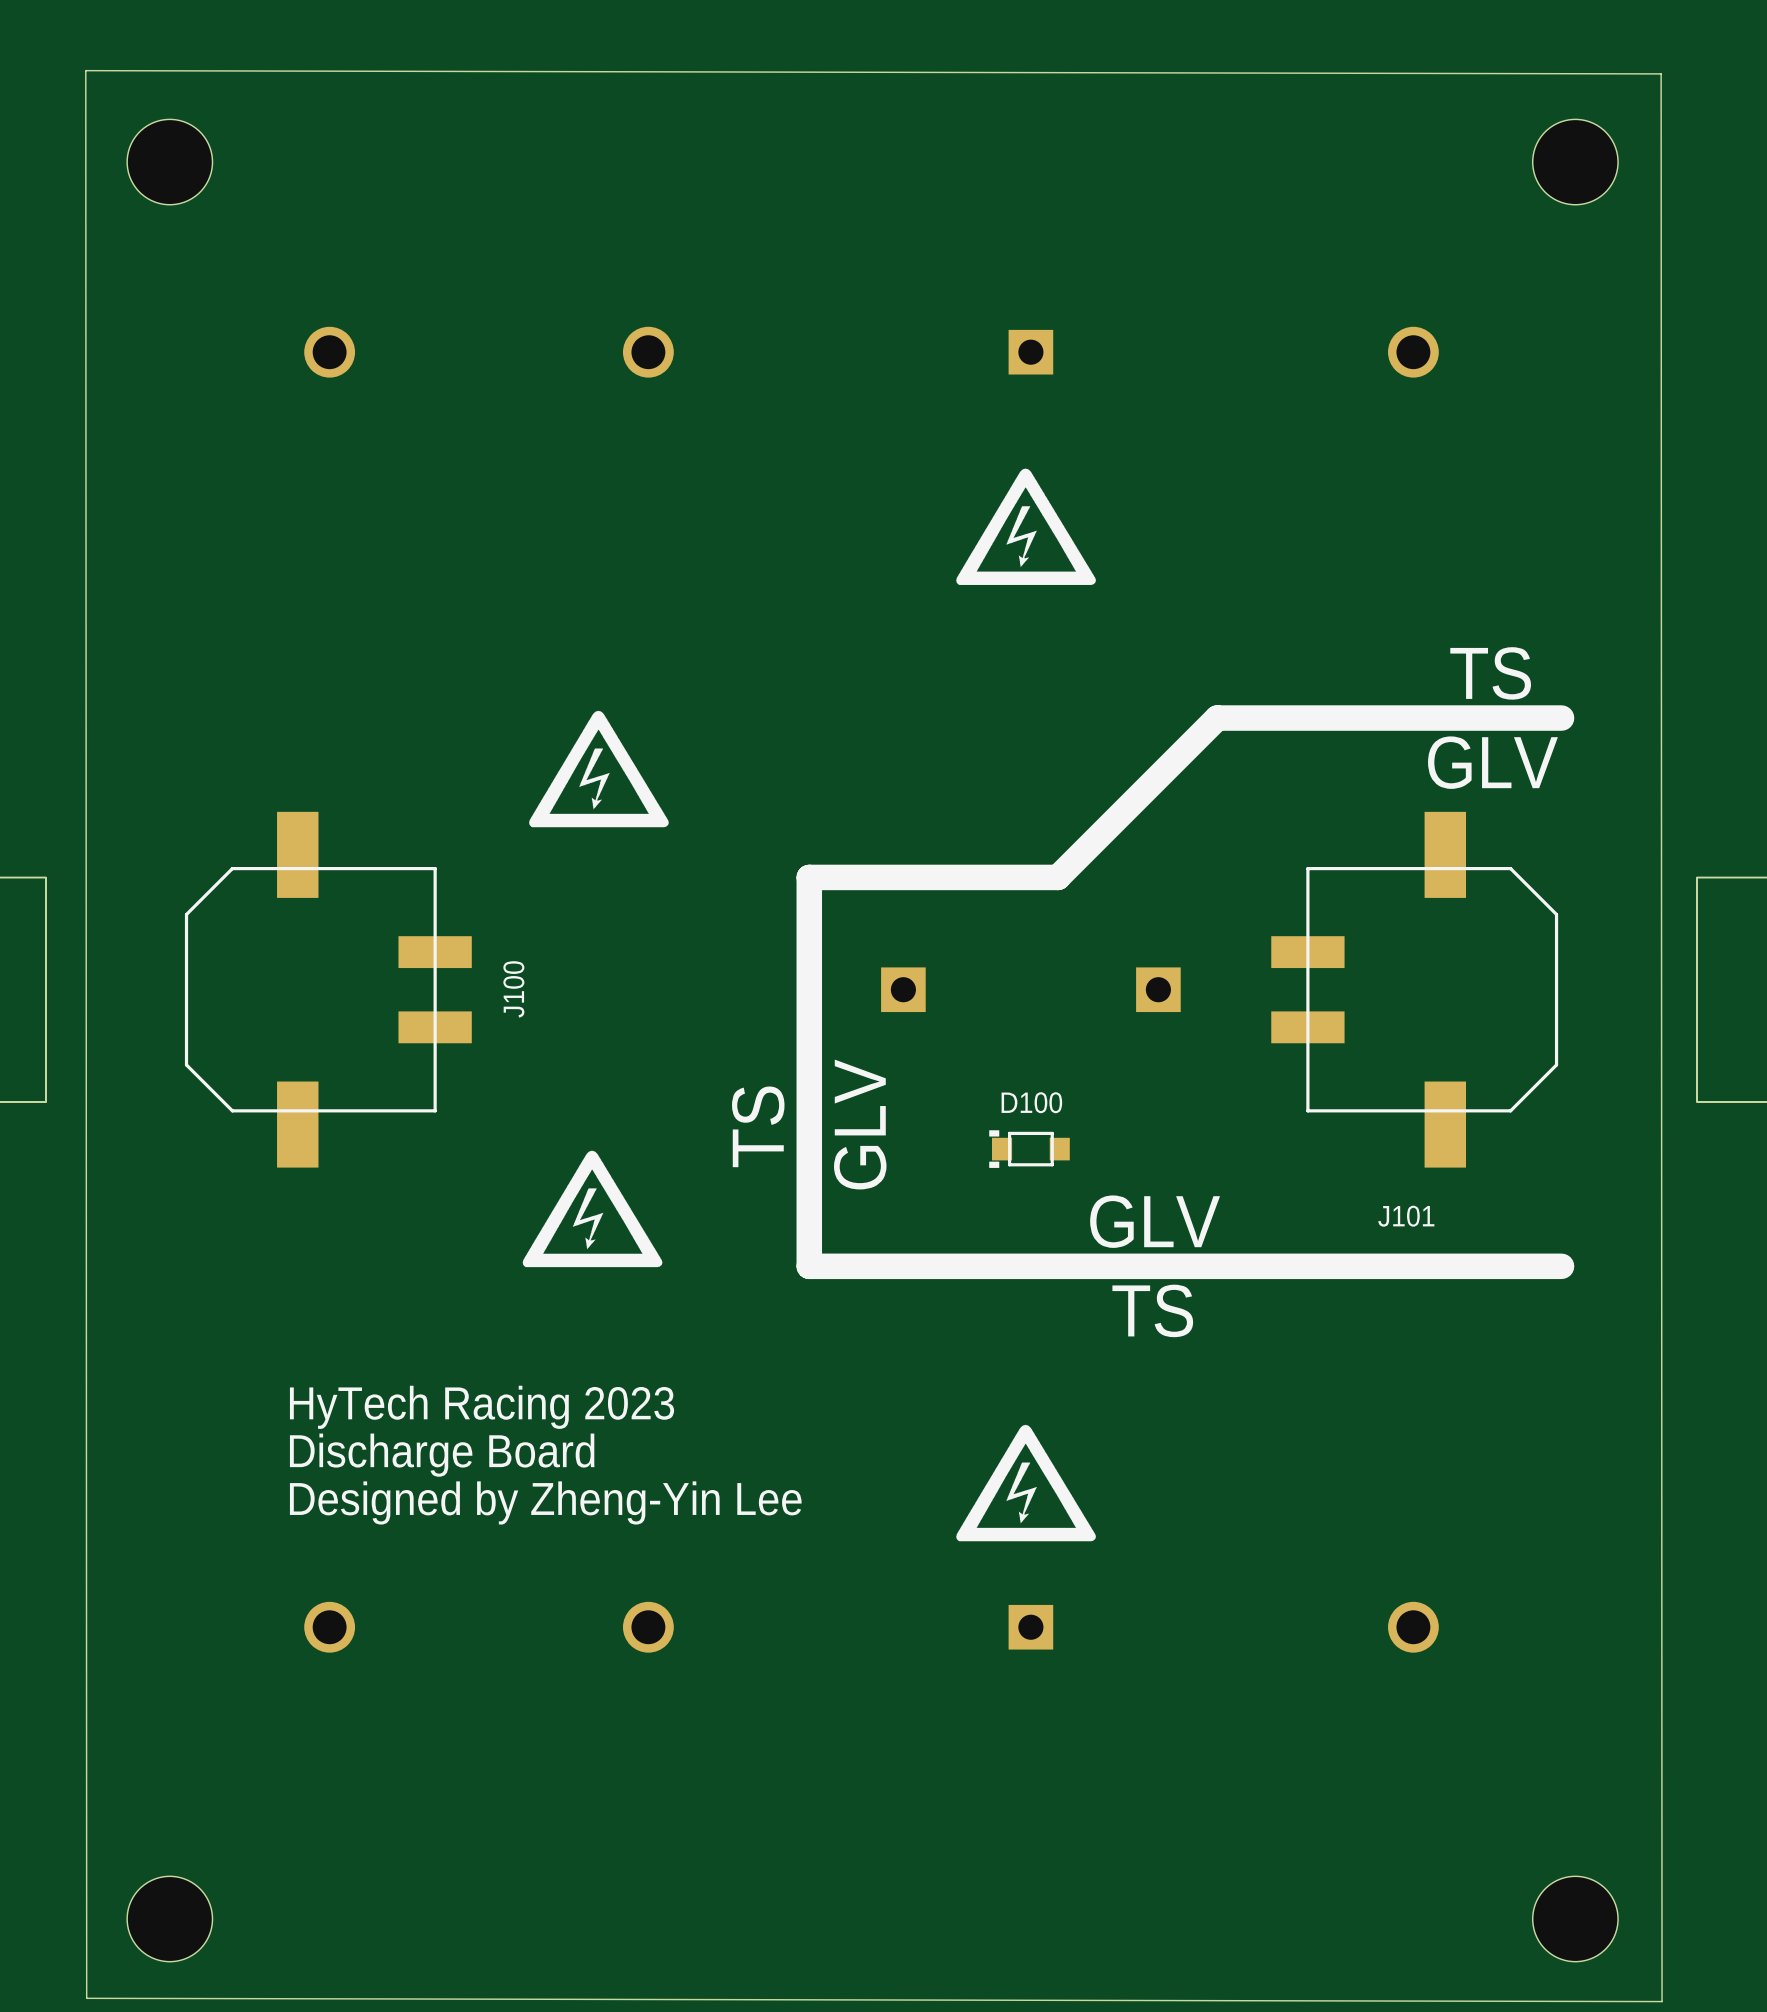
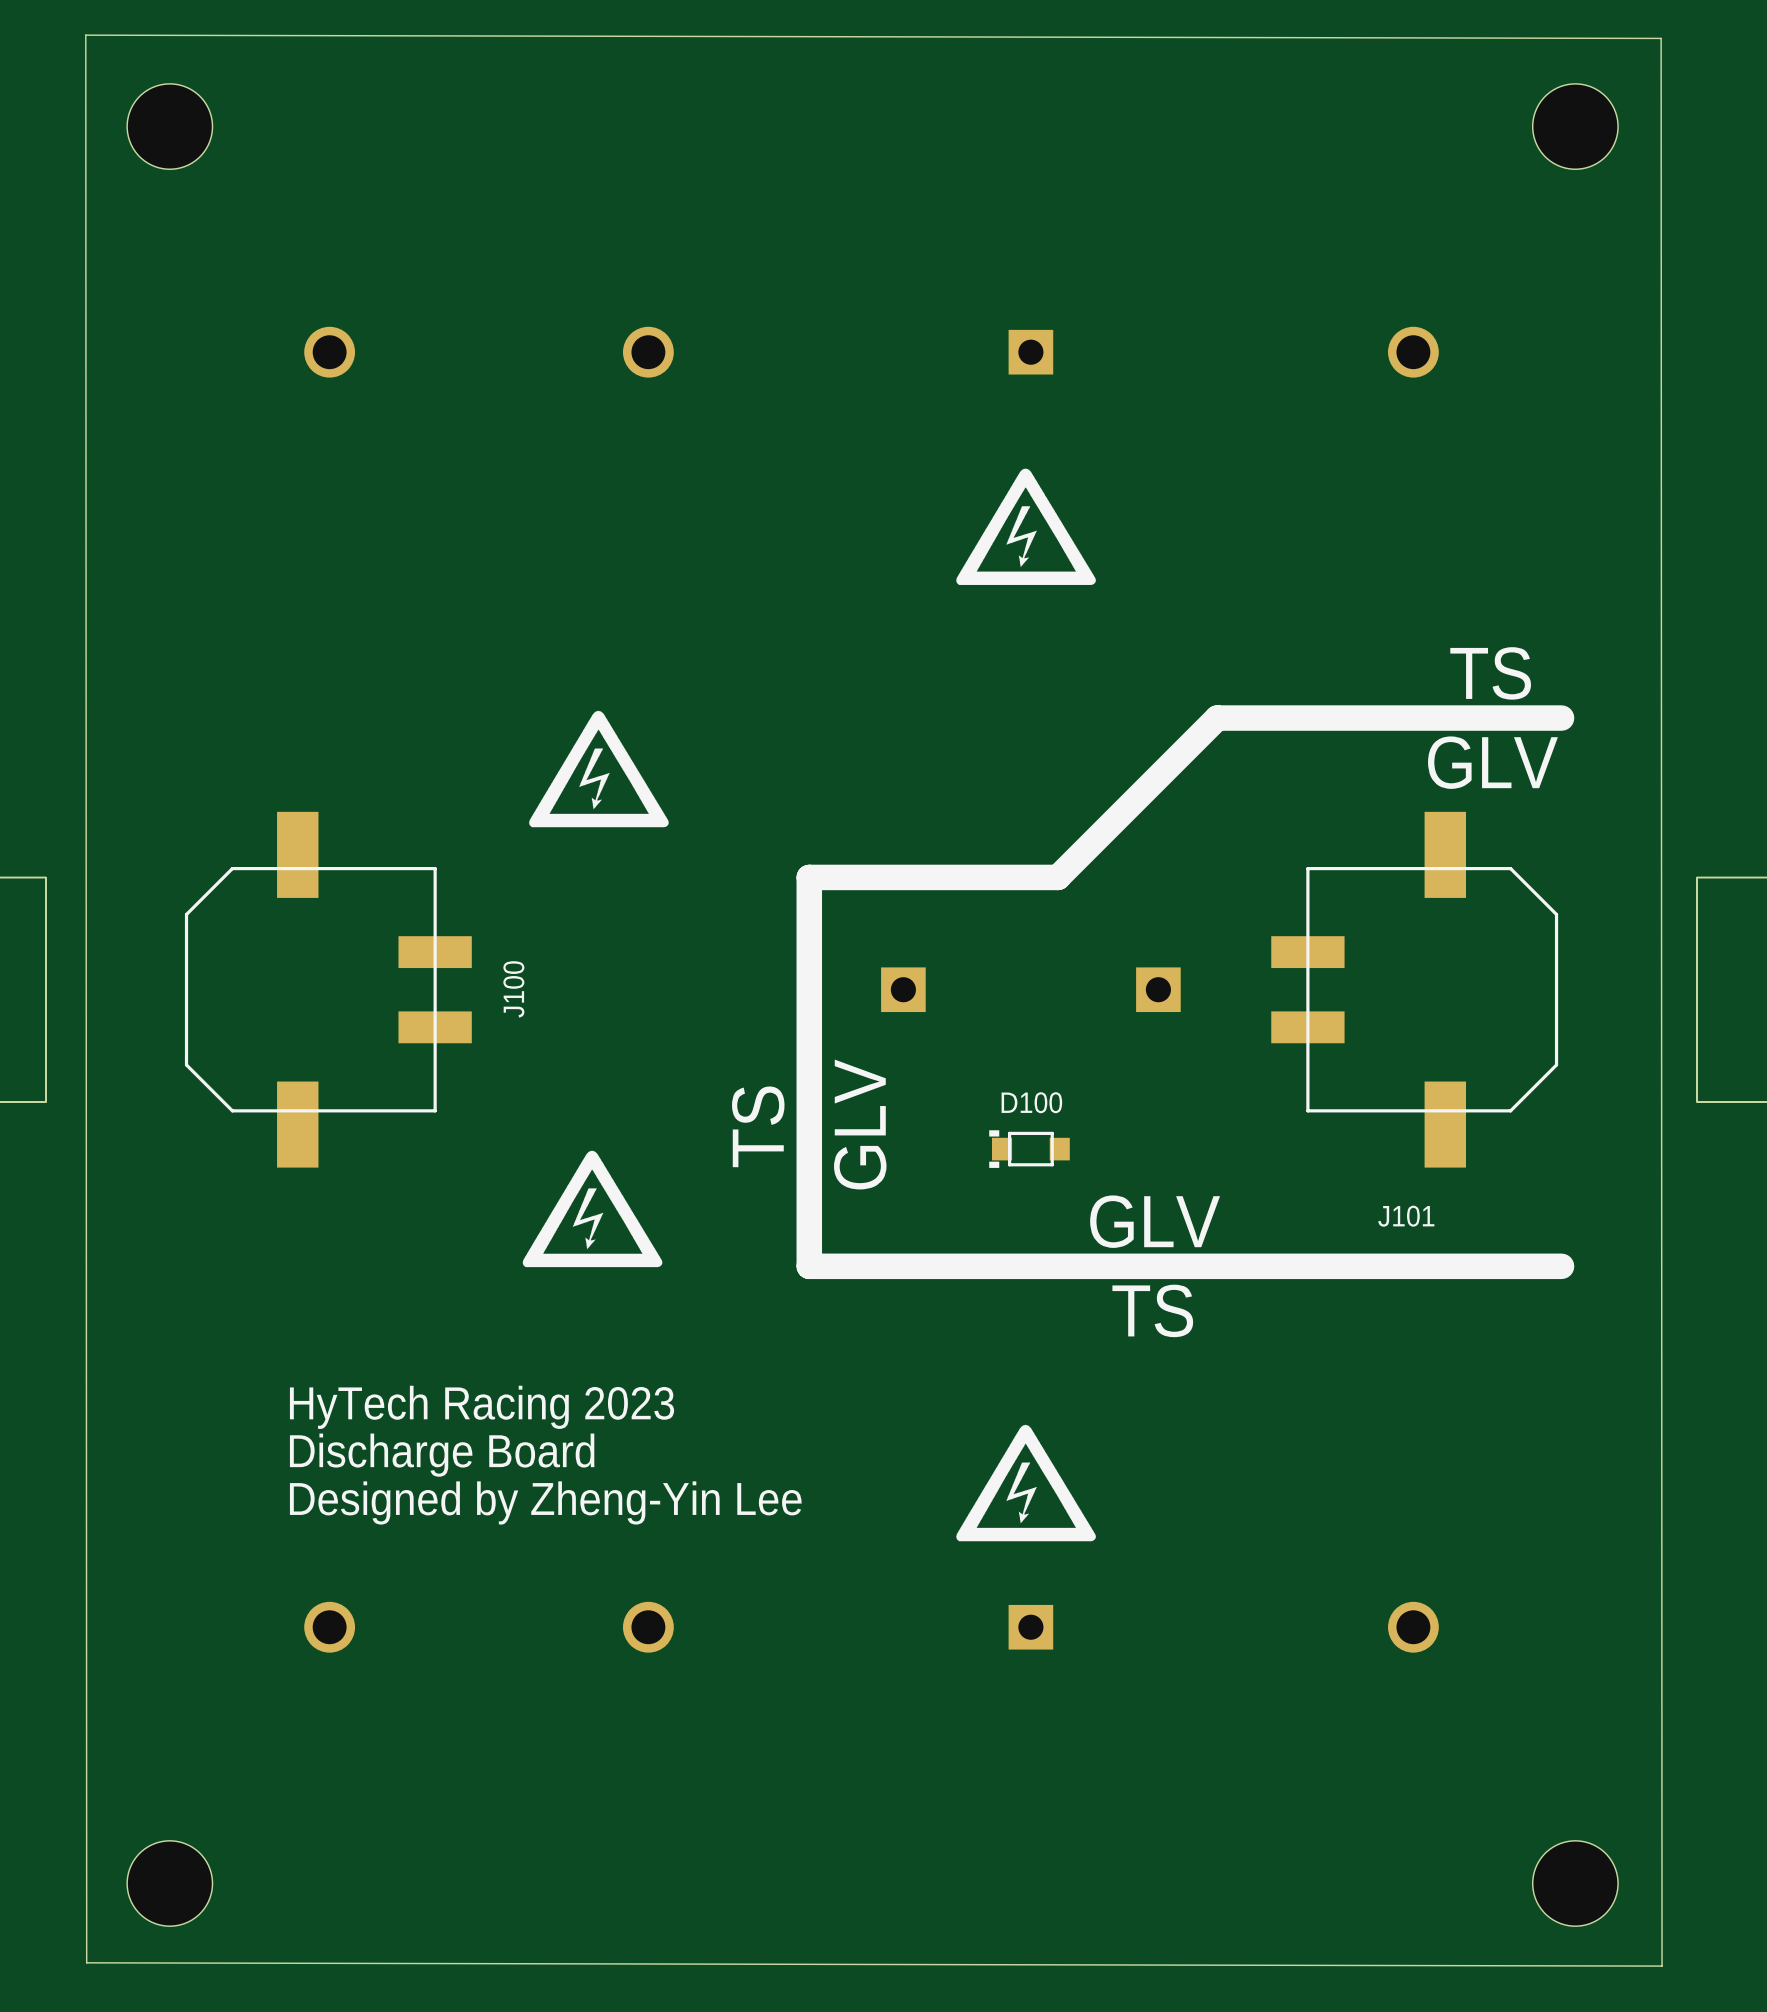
board edge: (85, 70) (1661, 73) (1662, 2001) (86, 1998) (86, 1962) -> (85, 70) (85, 35) (1661, 38) (1662, 1966) (86, 1962)
part position: (169, 162) -> (169, 126)
part position: (1575, 162) -> (1575, 126)
part position: (169, 1919) -> (169, 1883)
part position: (1575, 1919) -> (1575, 1883)

